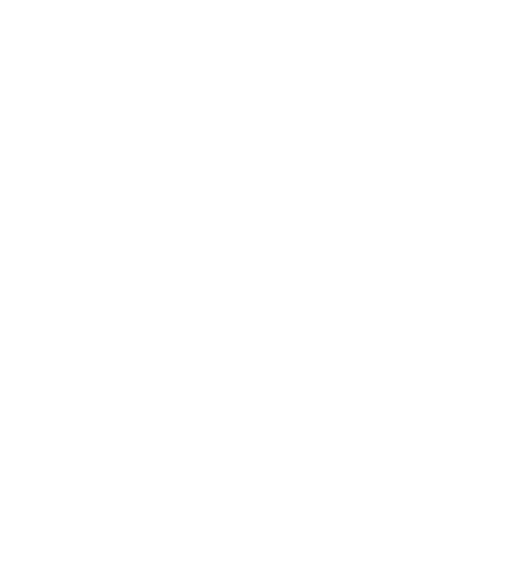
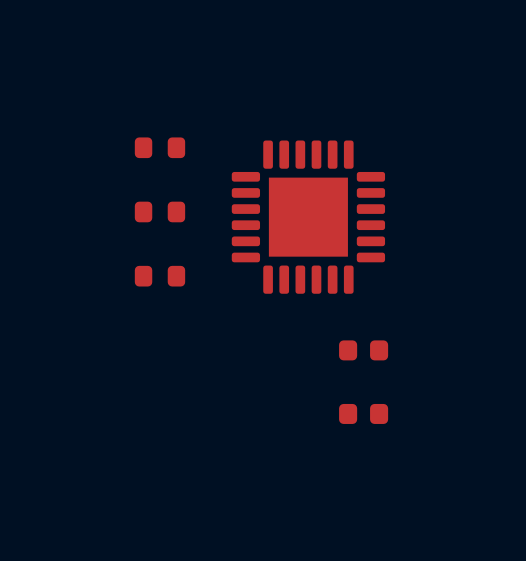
part: none -> (159, 147)
part: none -> (159, 211)
part: none -> (308, 217)
part: none -> (159, 276)
part: none -> (363, 350)
part: none -> (363, 413)

